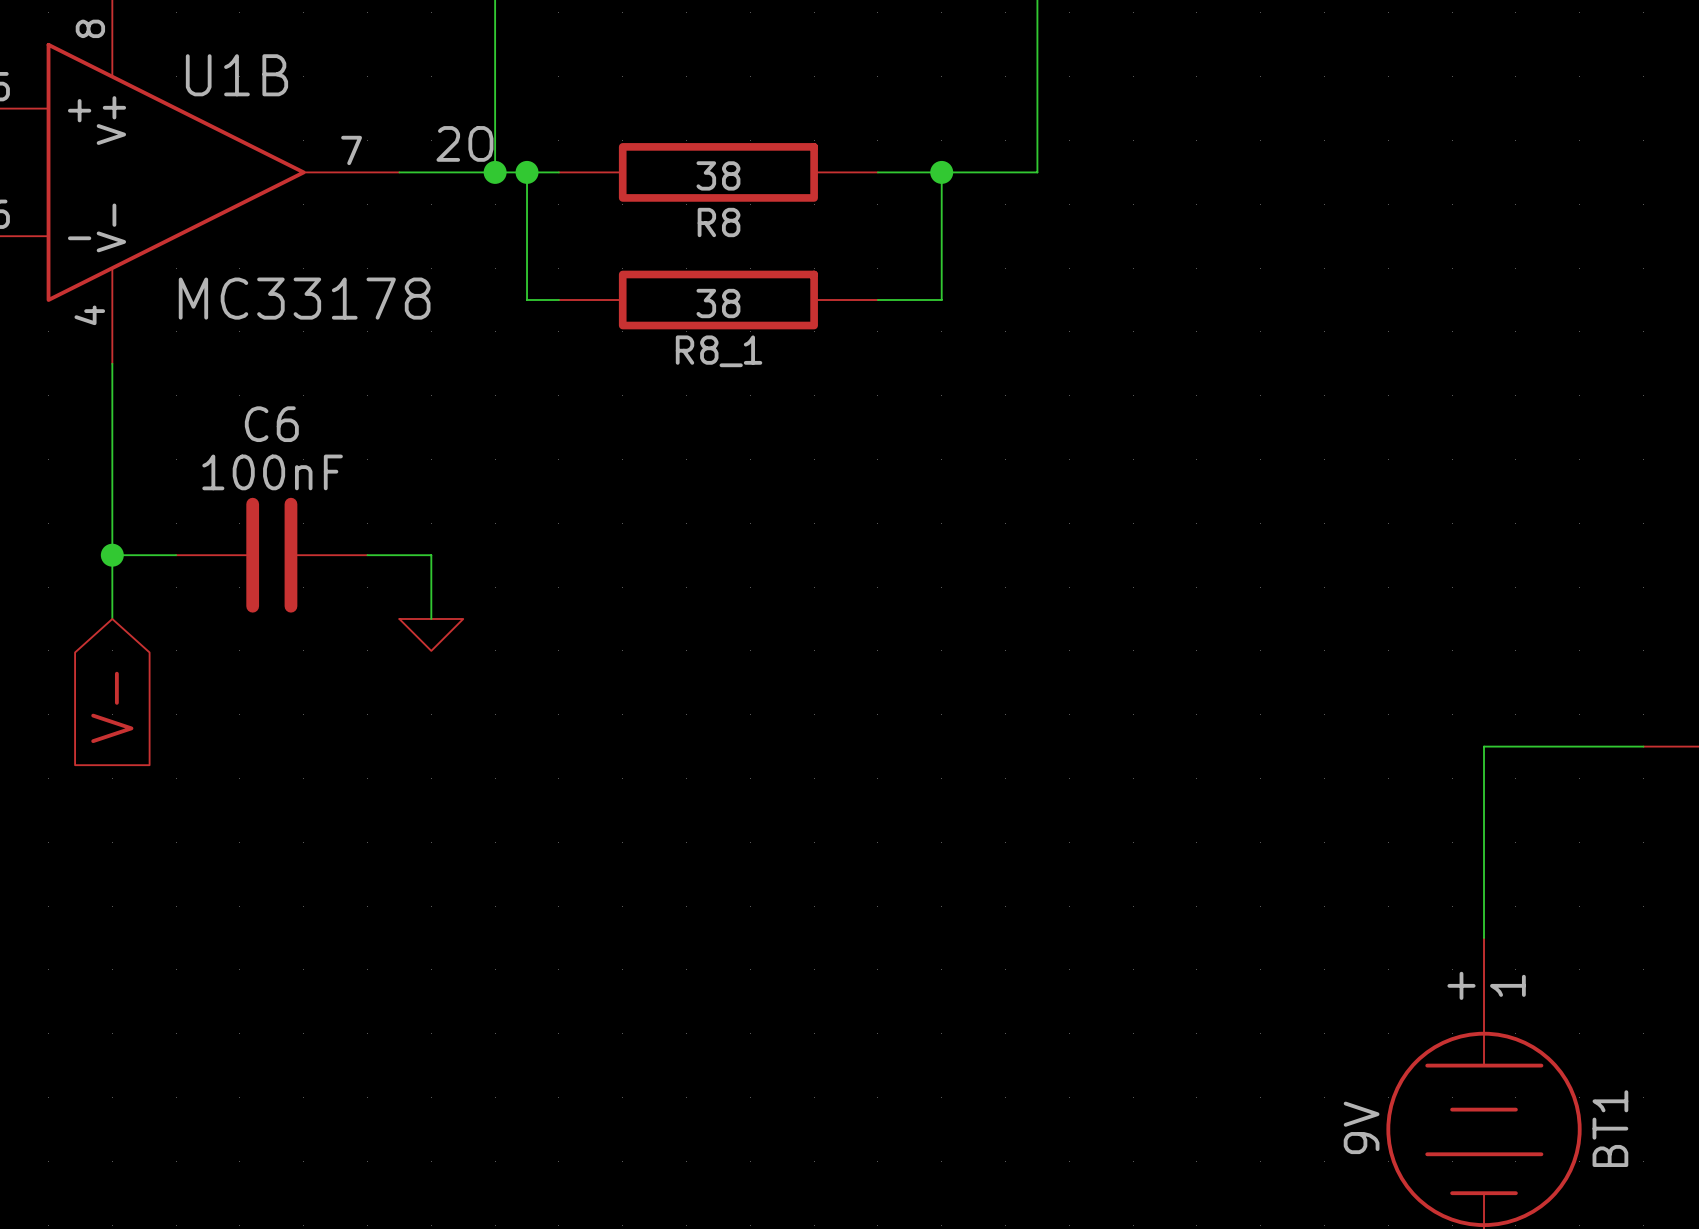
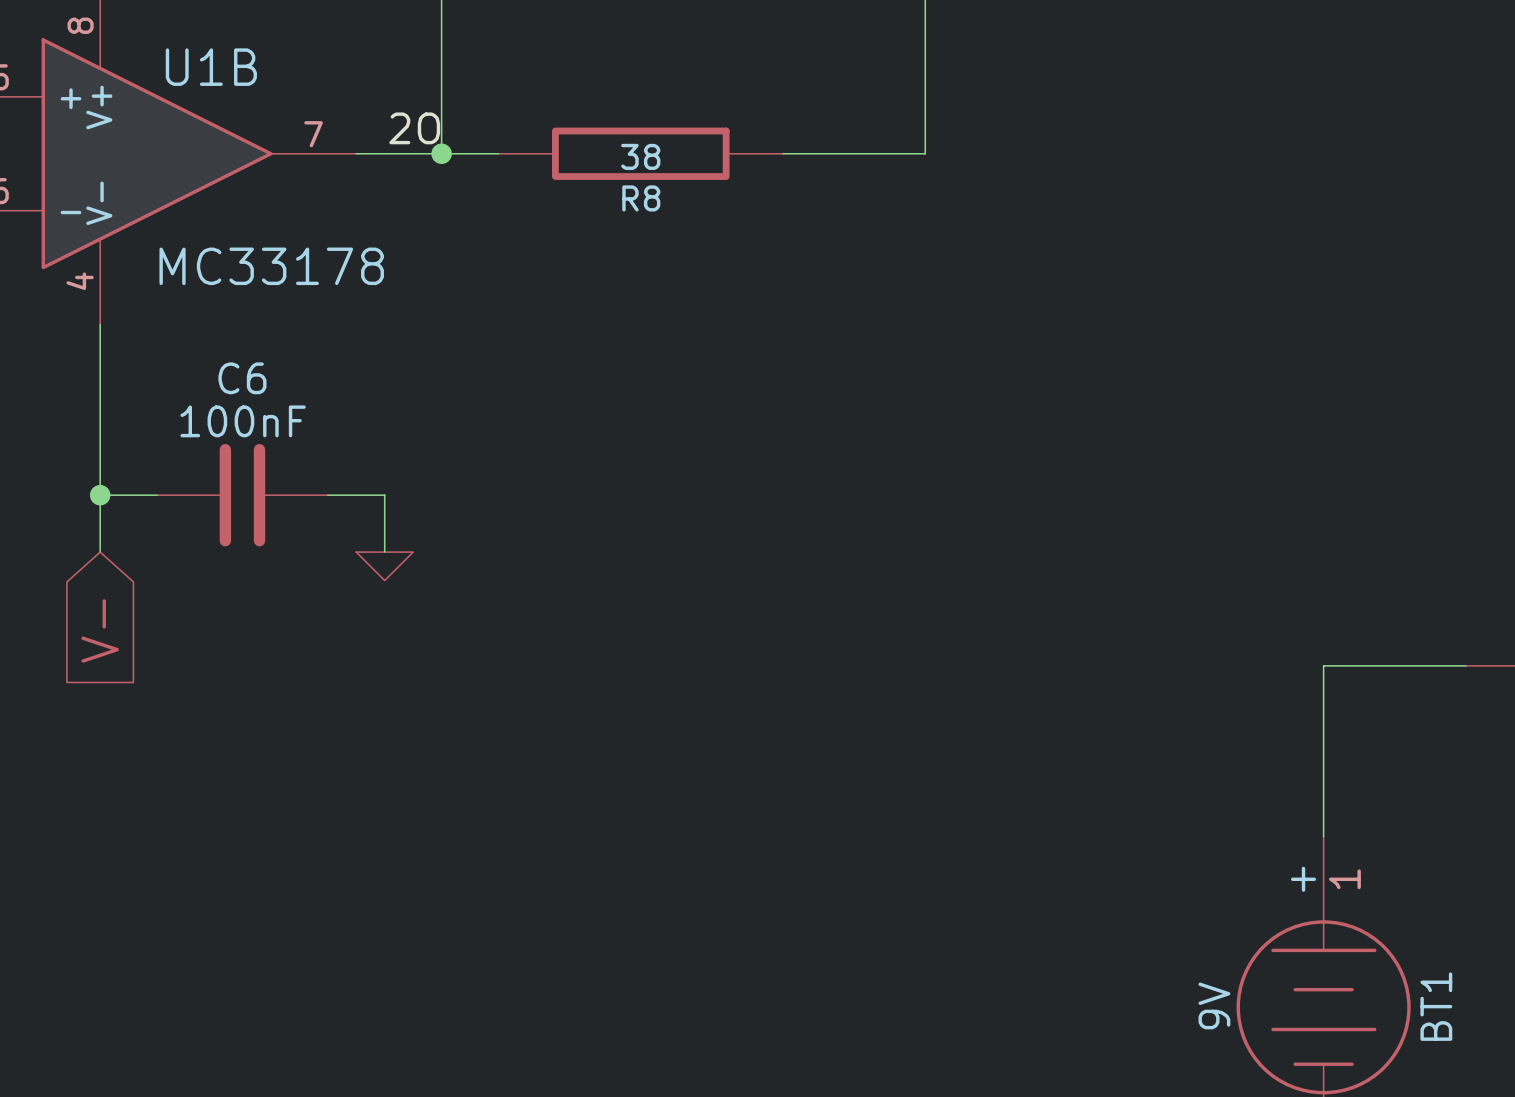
wire: (527, 172) (527, 300) (558, 300) -> none
junction: (527, 172) -> none
wire: (941, 172) (941, 300) (877, 300) -> none
junction: (941, 172) -> none
R8_1: 38 (718, 300) -> none

